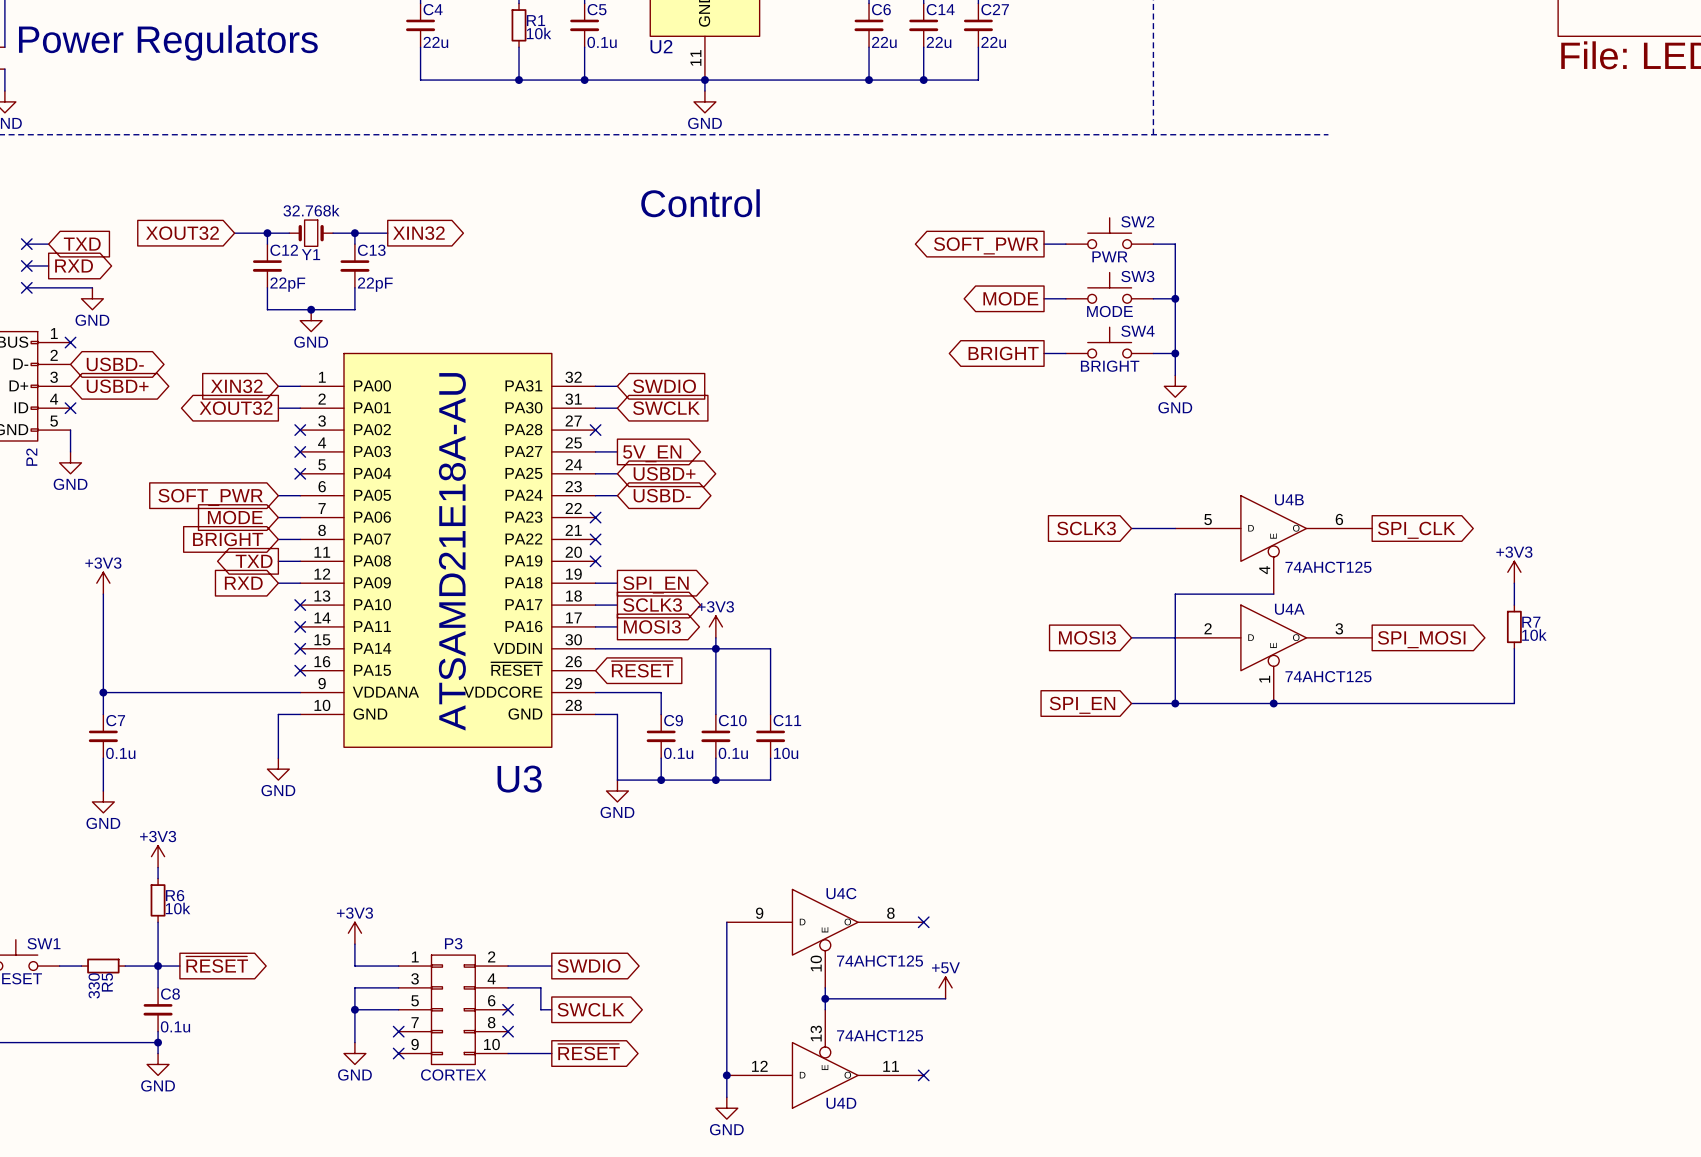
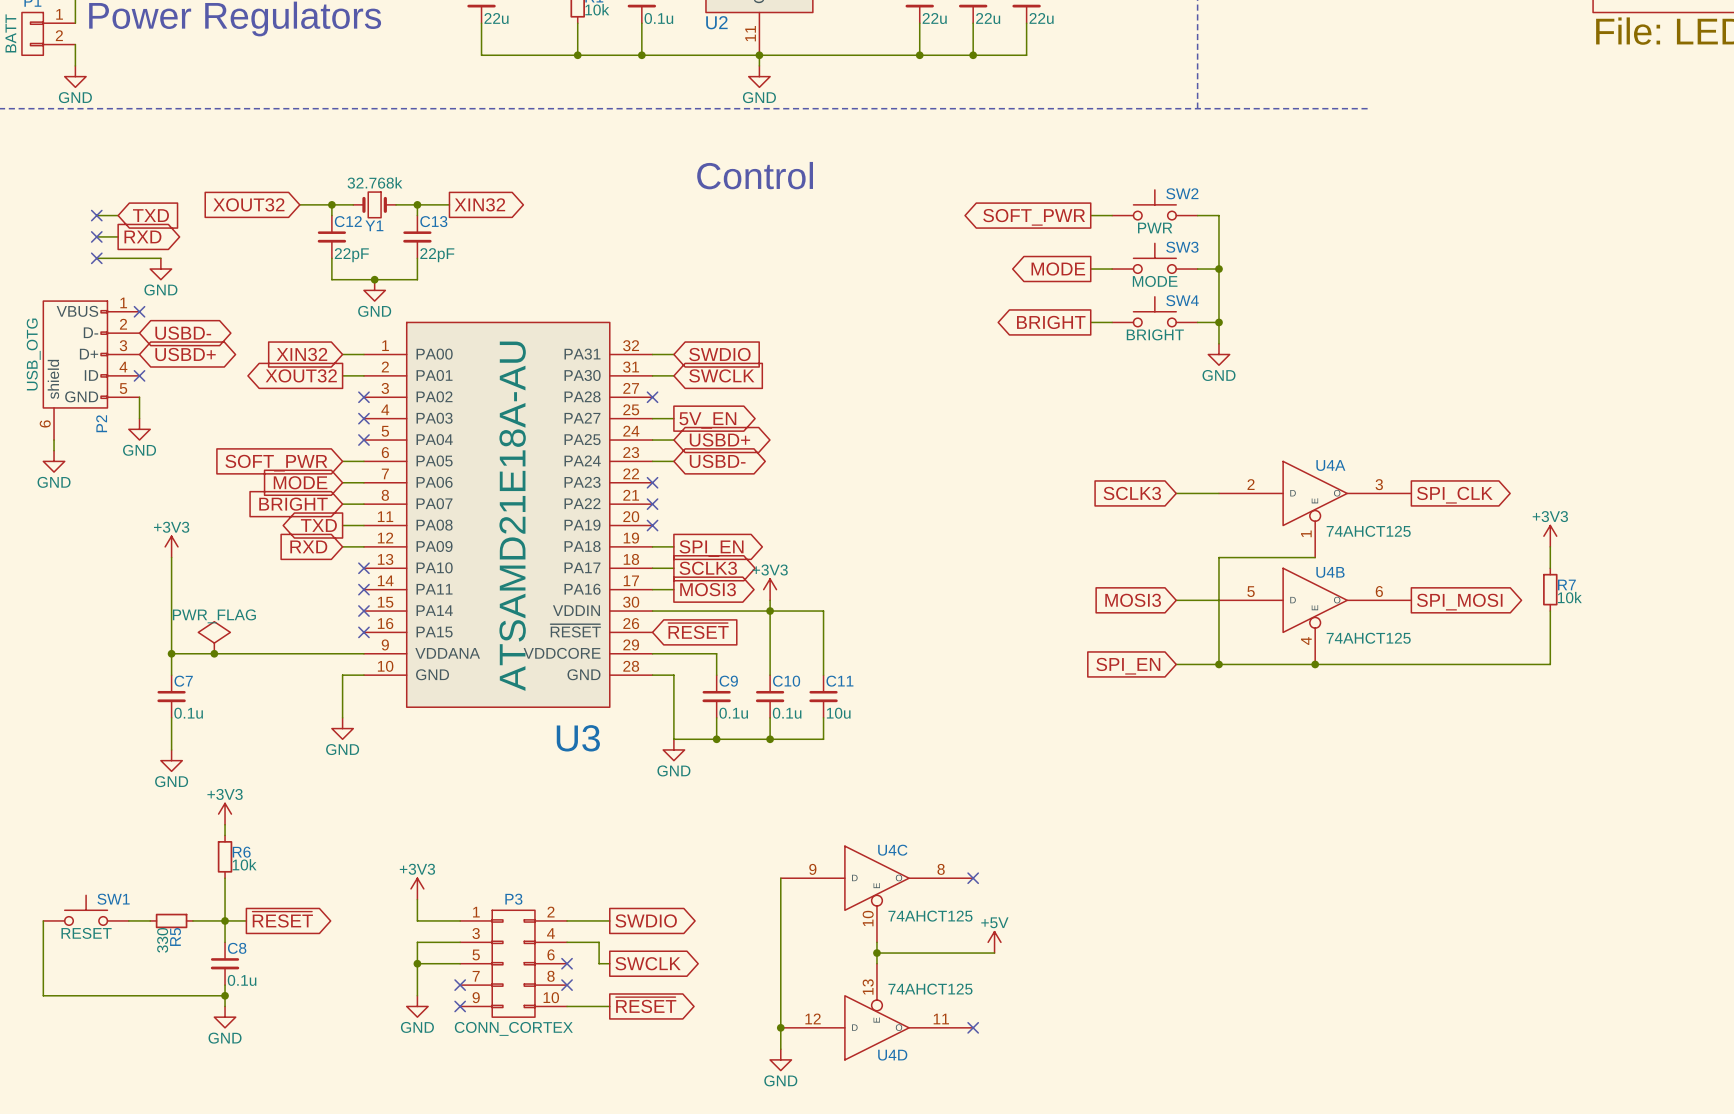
U4B position: (1273, 544) -> (1315, 616)
U4A position: (1273, 654) -> (1315, 509)
power symbol: none -> PWR_FLAG (214, 637)
junction: none -> (214, 653)
P3 value: CORTEX (453, 1074) -> CONN_CORTEX (513, 1028)

